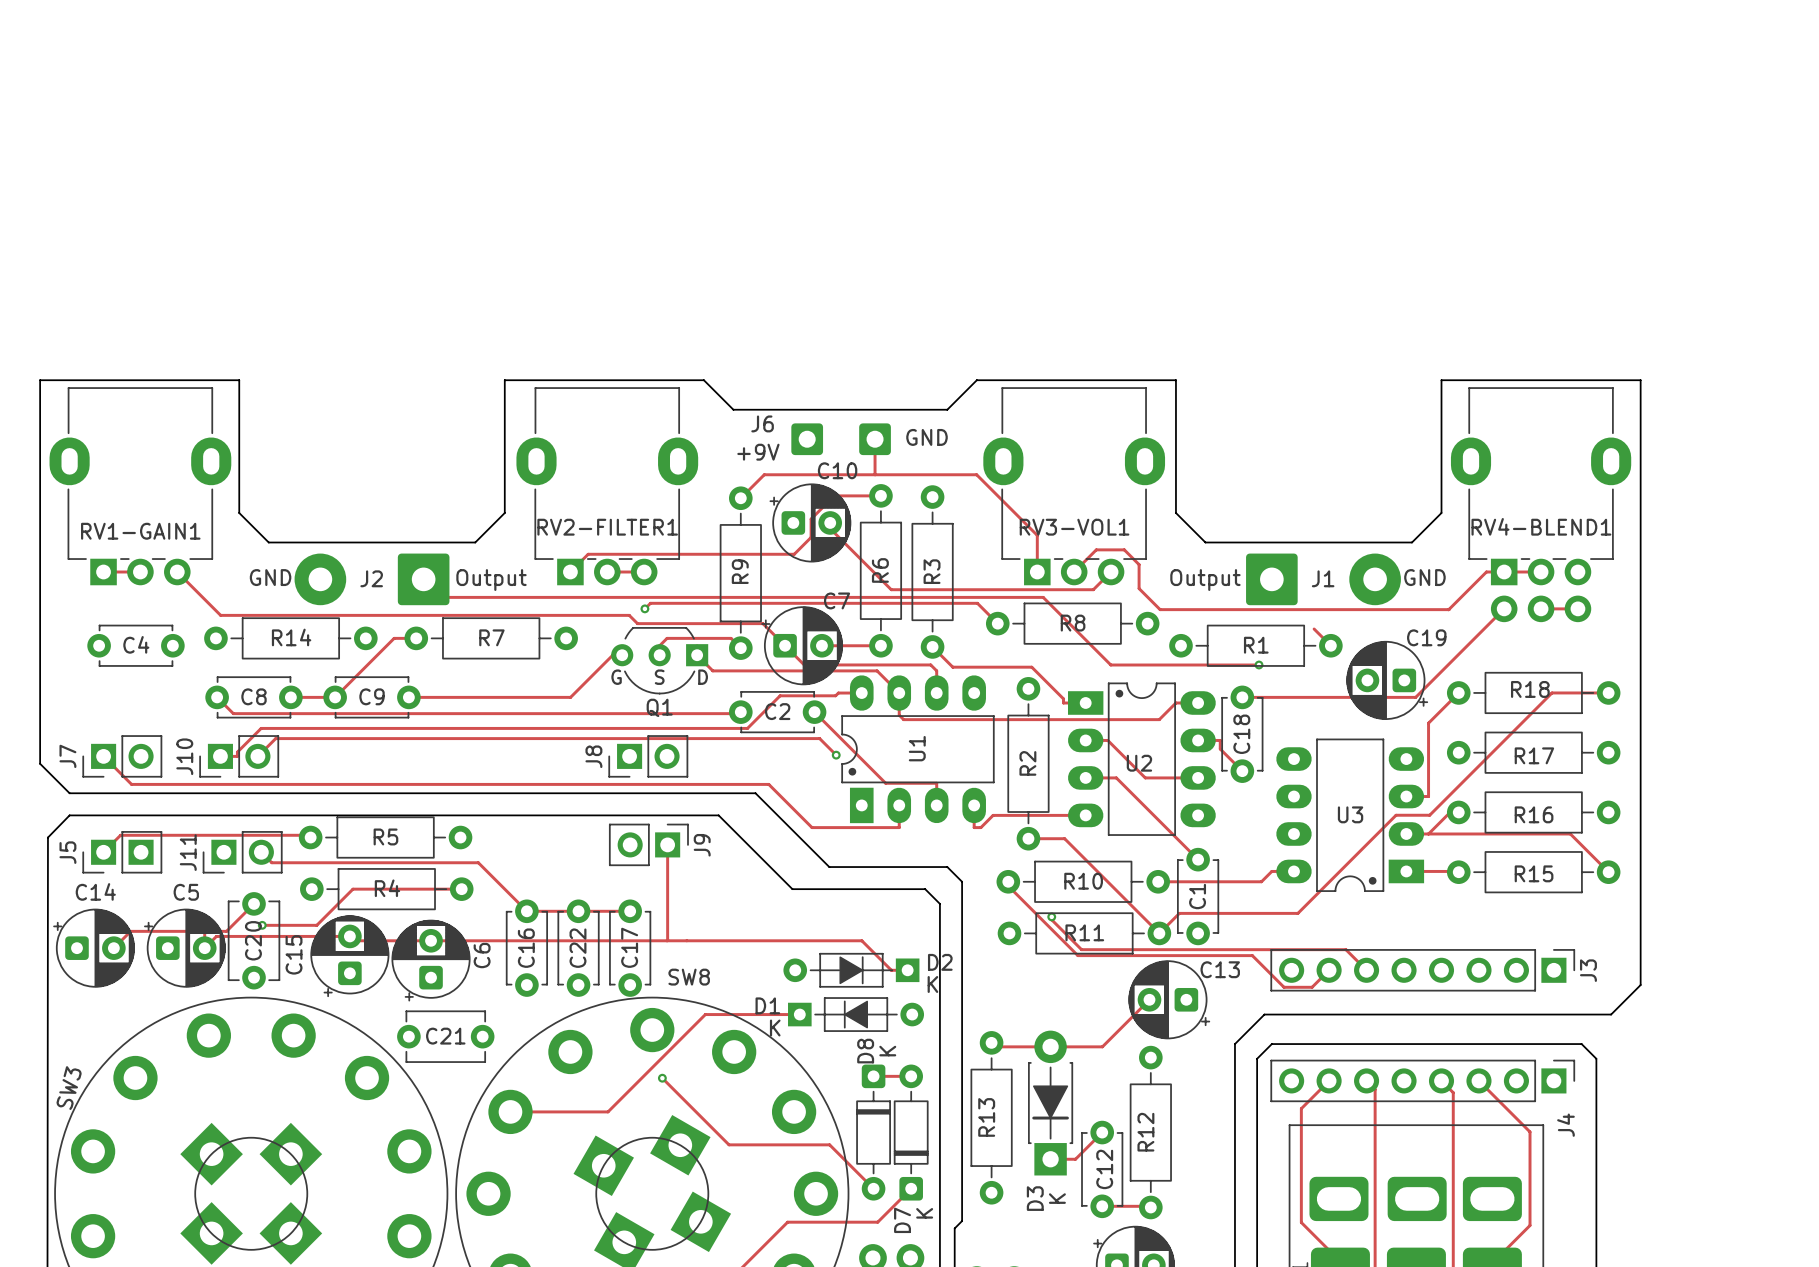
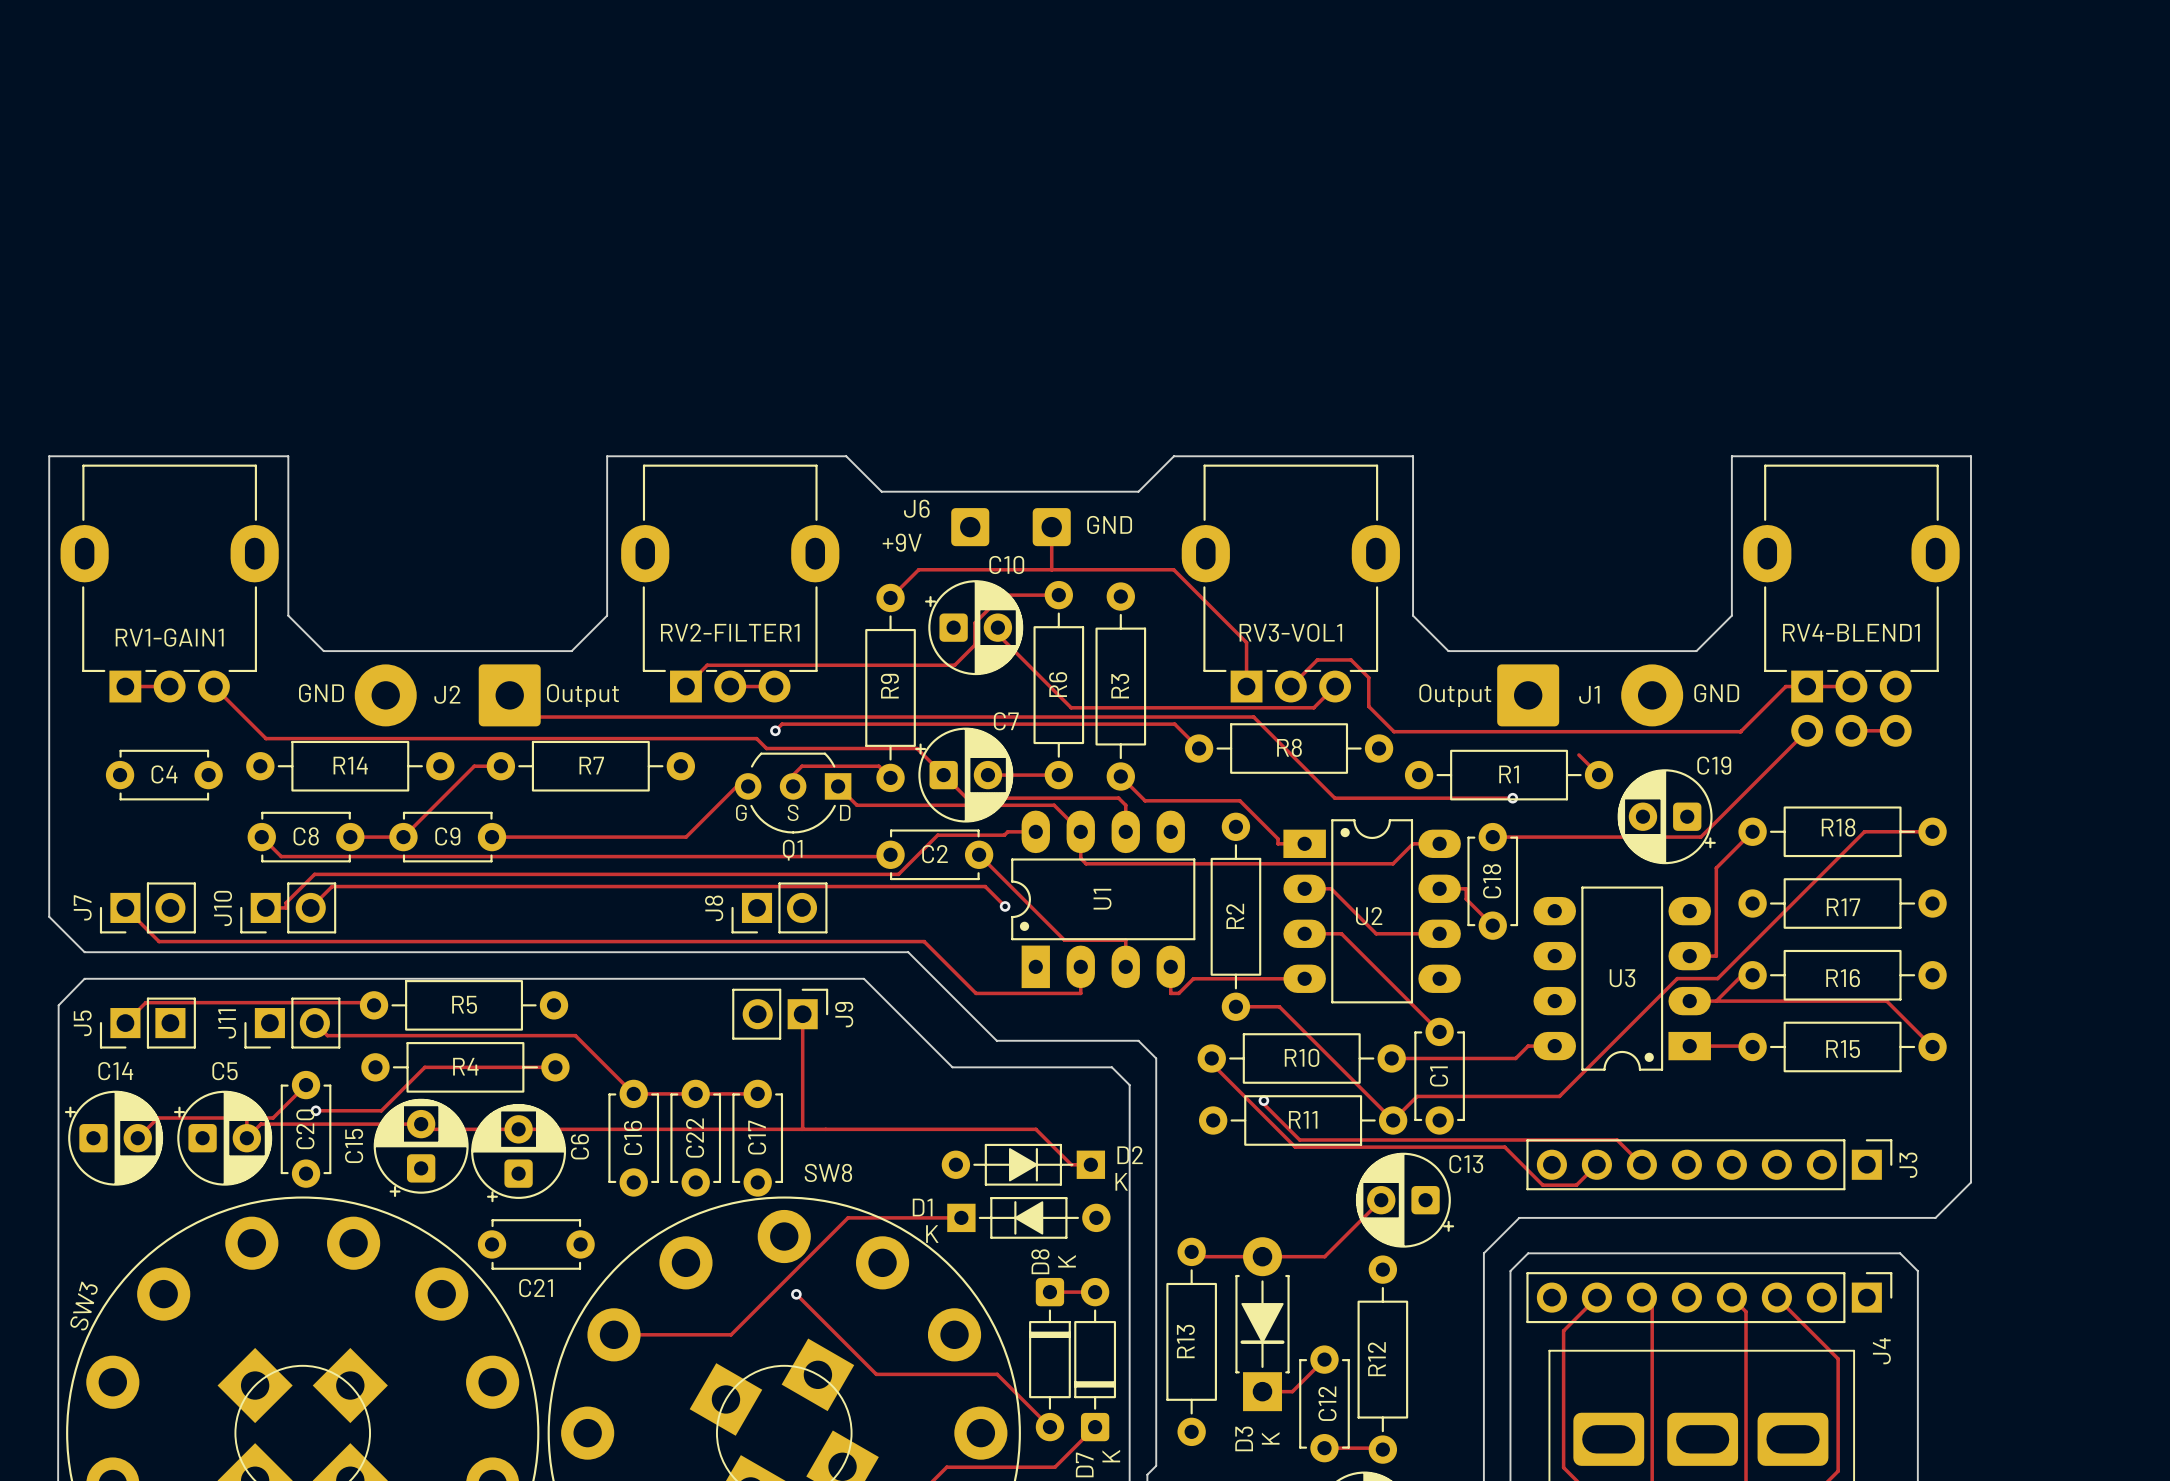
C20 footprint: [227, 892, 281, 990] -> [280, 1070, 332, 1188]
C21 footprint: [397, 1010, 495, 1063] -> [477, 1219, 595, 1270]
C21 name position: C21 (445, 1036) -> C21 (536, 1288)

